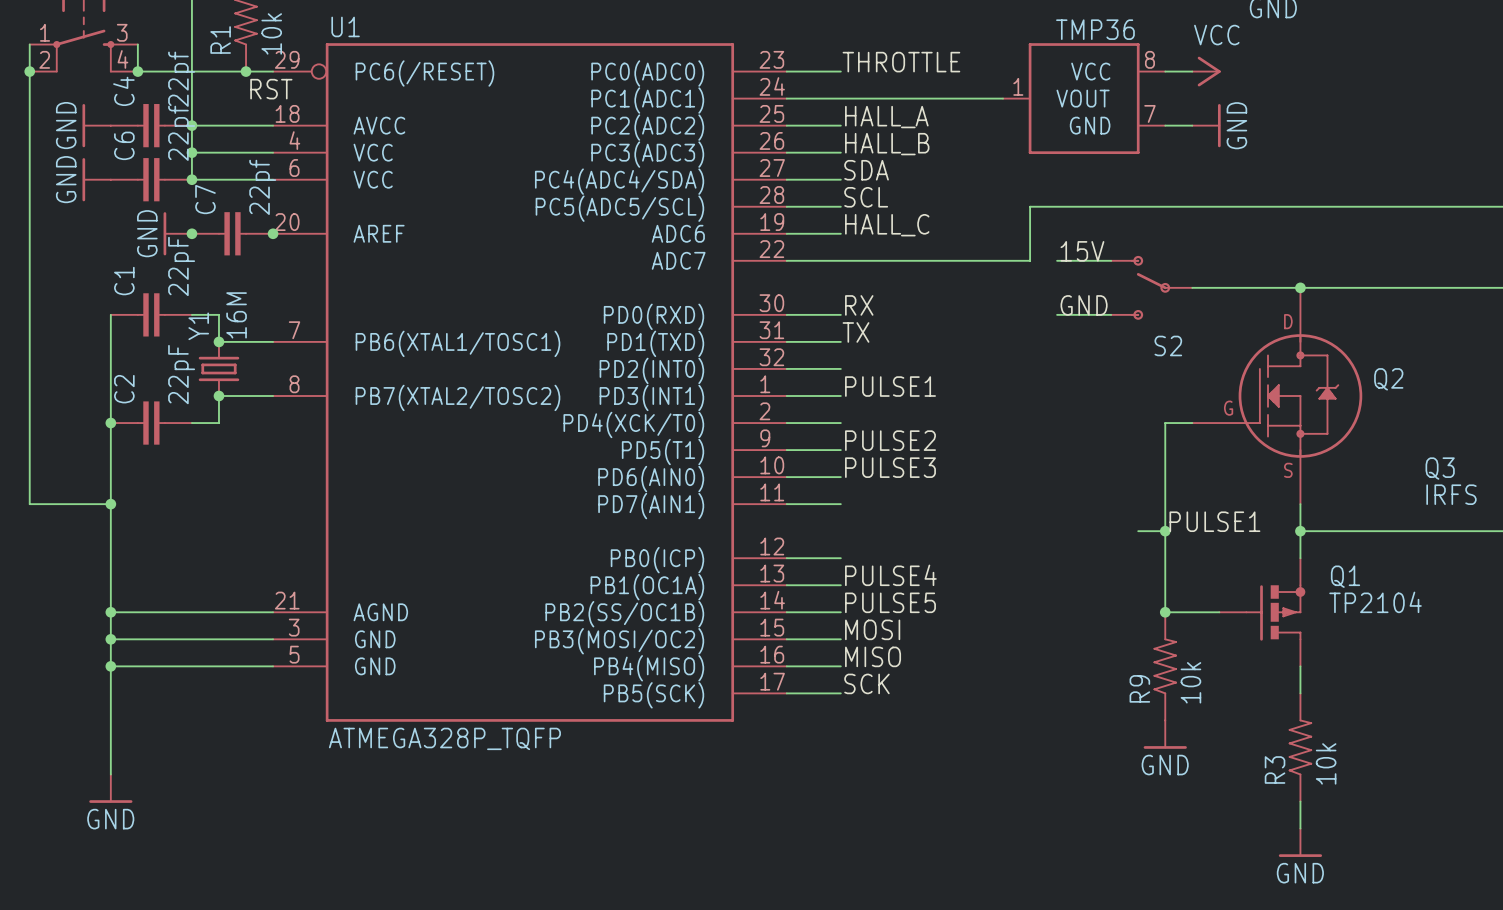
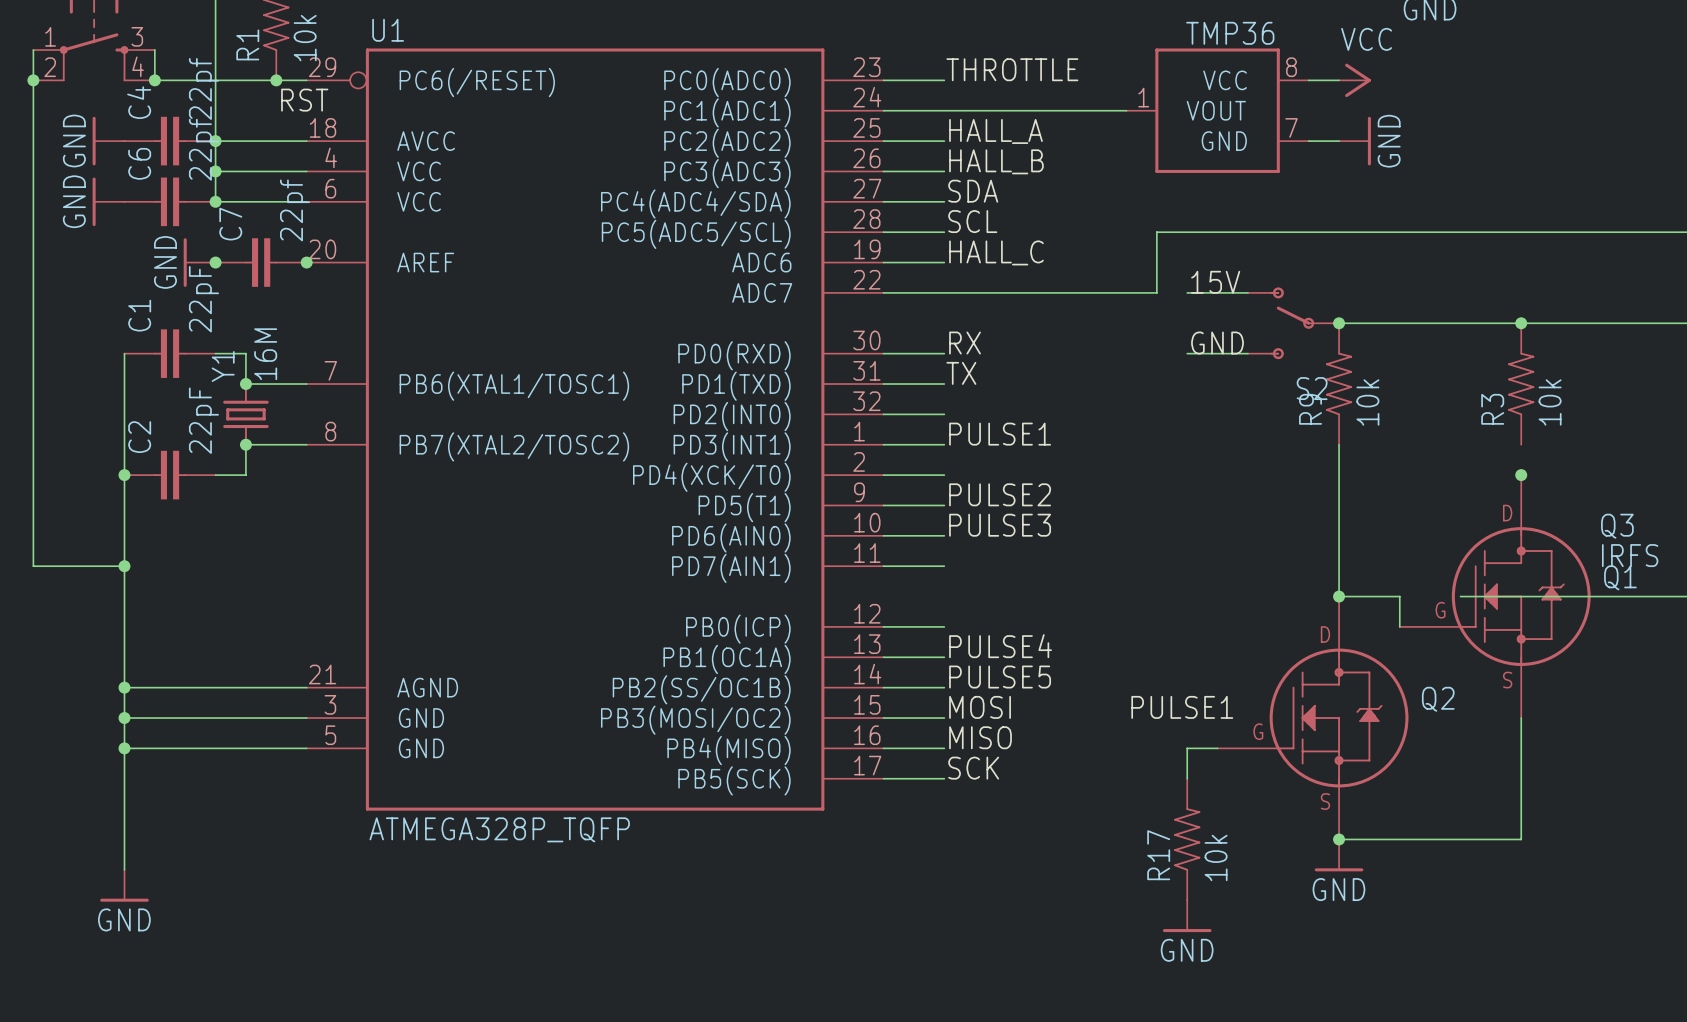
junction: none -> (1339, 323)
junction: (1300, 287) -> none
junction: none -> (1521, 323)
wire: none -> (1339, 444) (1339, 596) (1399, 596) (1399, 626)
Q2 position: (1277, 395) -> (1313, 718)
wire: (1192, 423) (1165, 423) (1165, 612) (1219, 612) -> none
junction: none -> (1521, 475)
wire: (1300, 504) (1300, 558) -> none
label position: PULSE1 (1214, 521) -> PULSE1 (1182, 707)
wire: (1138, 531) (1165, 531) -> none
junction position: (1165, 531) -> (1339, 596)
junction: (1300, 531) -> none
Q1 symbol: [1219, 558, 1306, 667] -> [1399, 475, 1591, 719]
Q1 name position: Q1 (1345, 576) -> Q1 (1620, 577)
Q1 value: TP2104 (1375, 602) -> none
junction: (1165, 612) -> none
wire: none -> (1521, 718) (1521, 839) (1339, 839)
wire: none -> (1217, 748) (1187, 748) (1187, 778)
R9 position: (1165, 666) -> (1339, 384)
wire: (1300, 666) (1300, 693) -> none
power symbol position: GND (1165, 734) -> GND (1339, 855)
R17: none -> 10k (1187, 839)
junction: none -> (1339, 839)
R3 position: (1300, 747) -> (1521, 384)
wire: (1300, 801) (1300, 828) -> none
power symbol: none -> GND (1187, 916)
power symbol: GND (1300, 842) -> none

